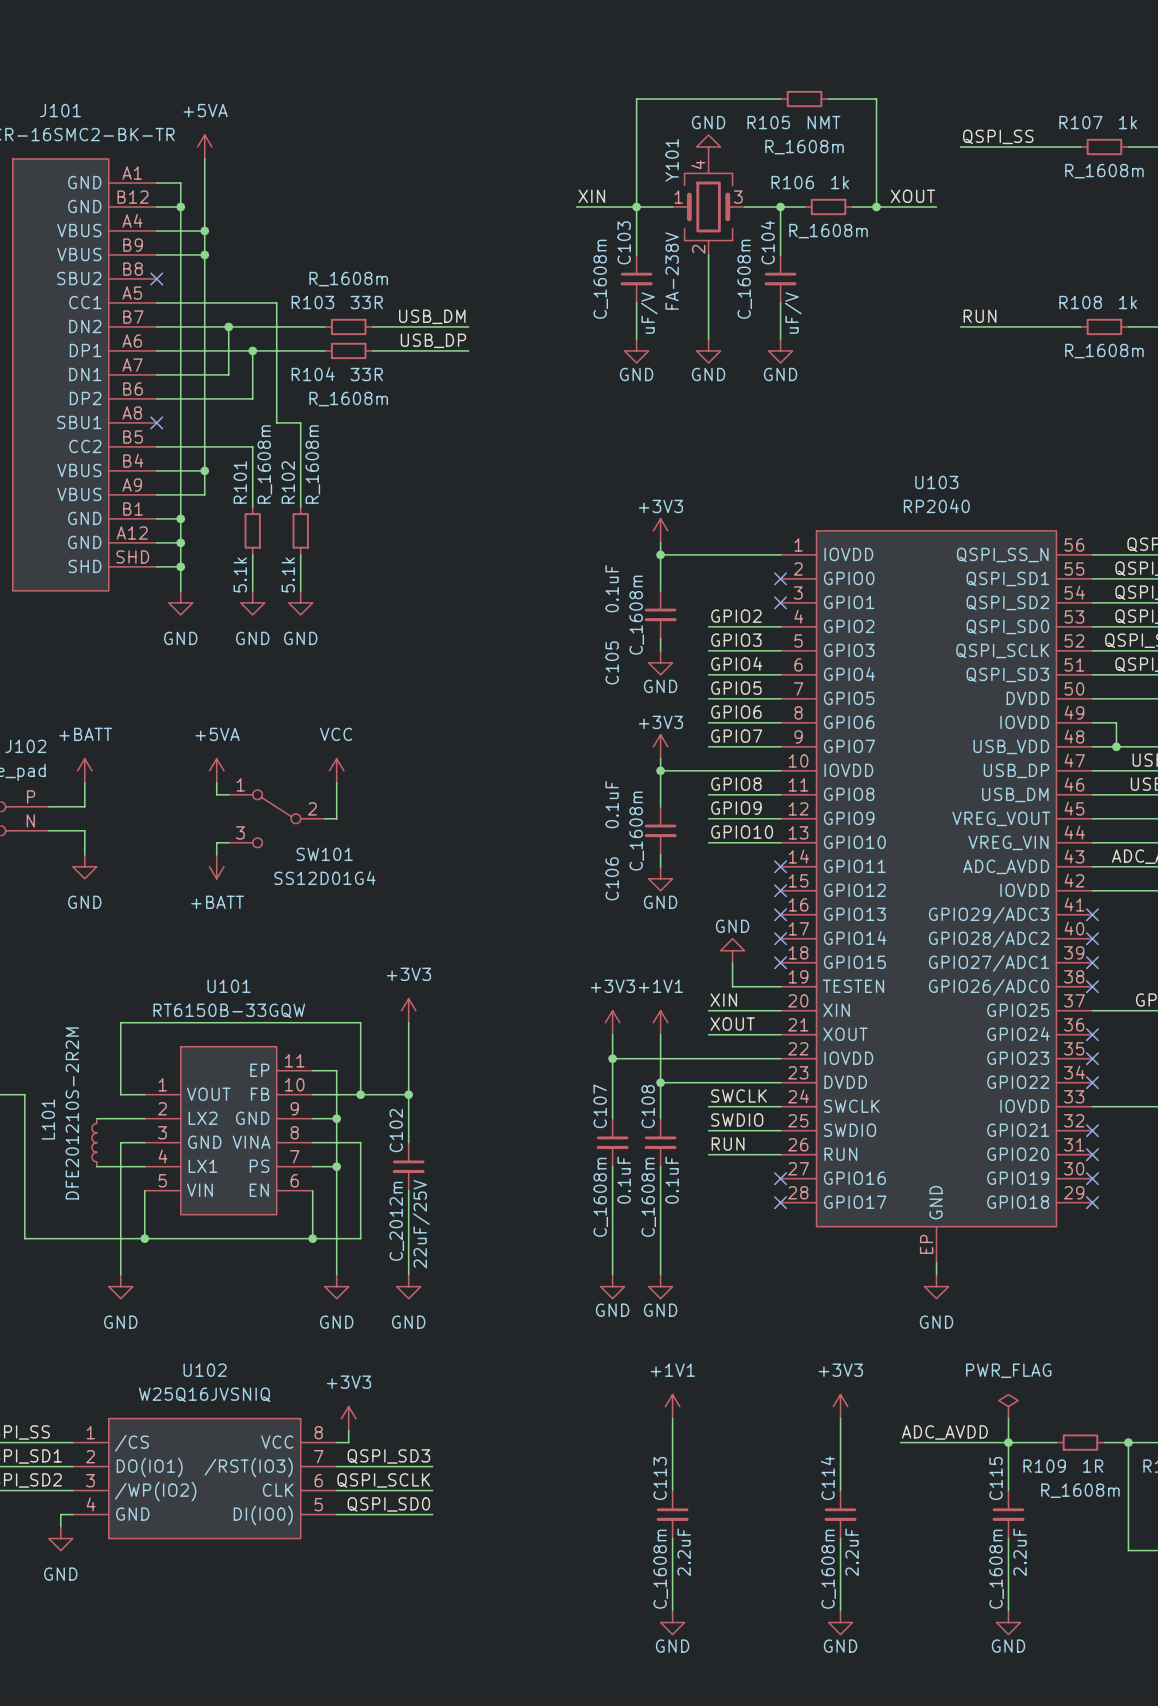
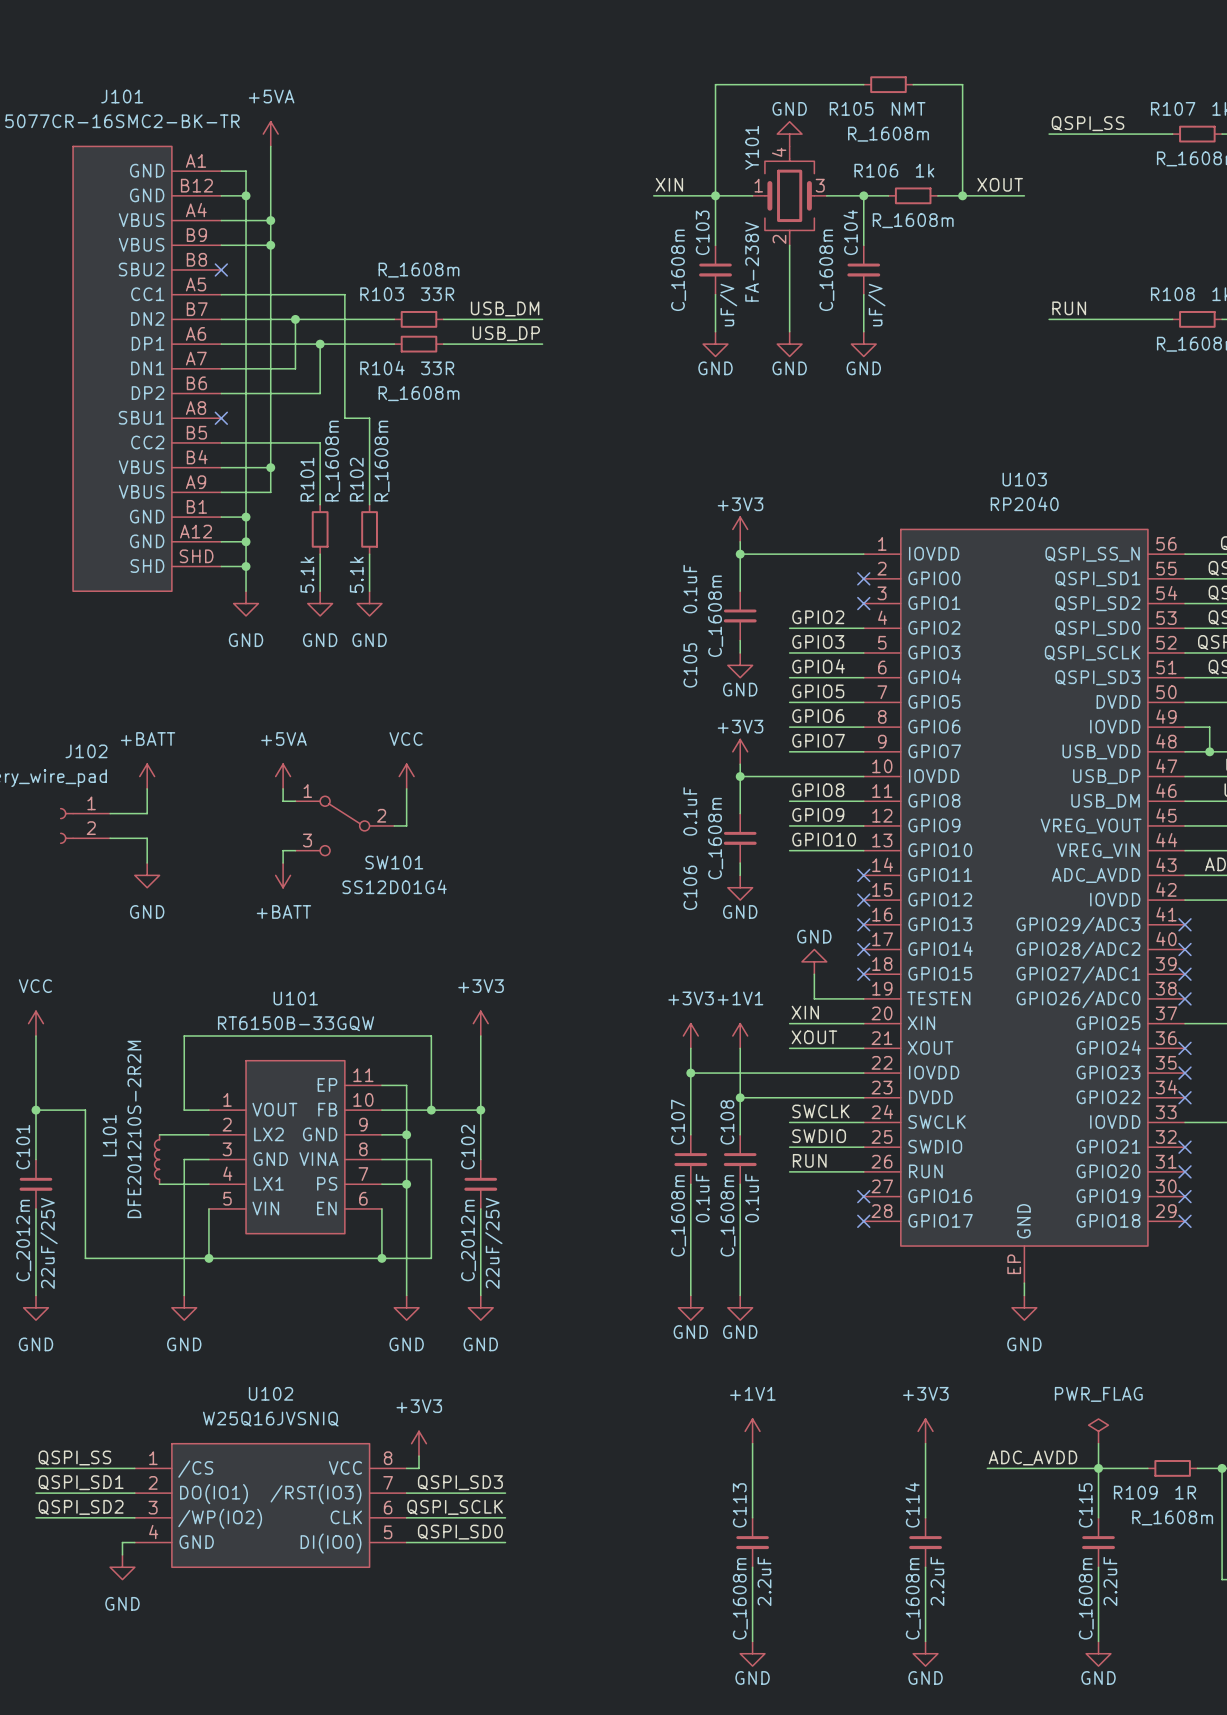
J102 pin number: P (31, 796) -> 1 (91, 803)
J102 pin number: N (30, 820) -> 2 (91, 828)

